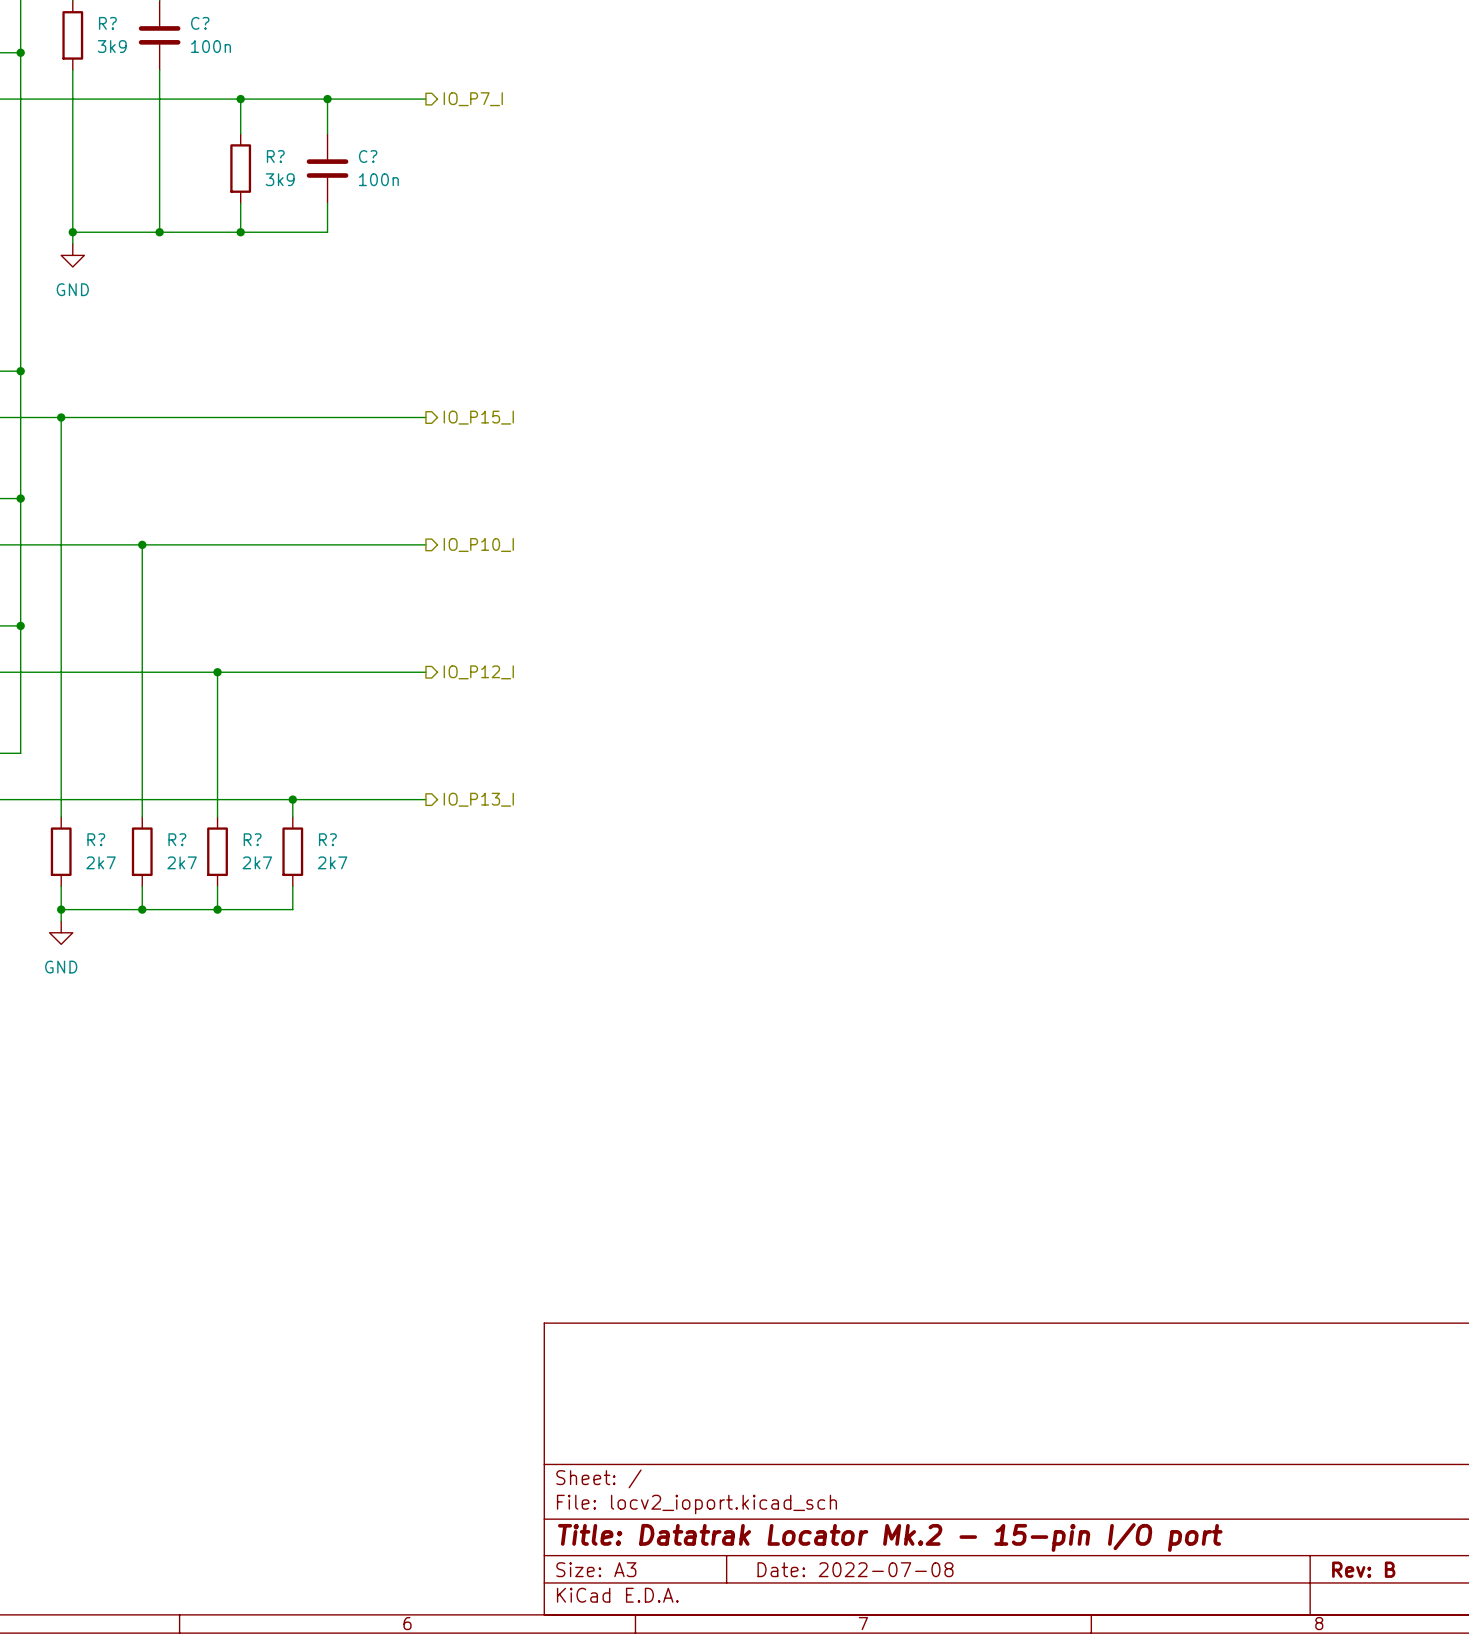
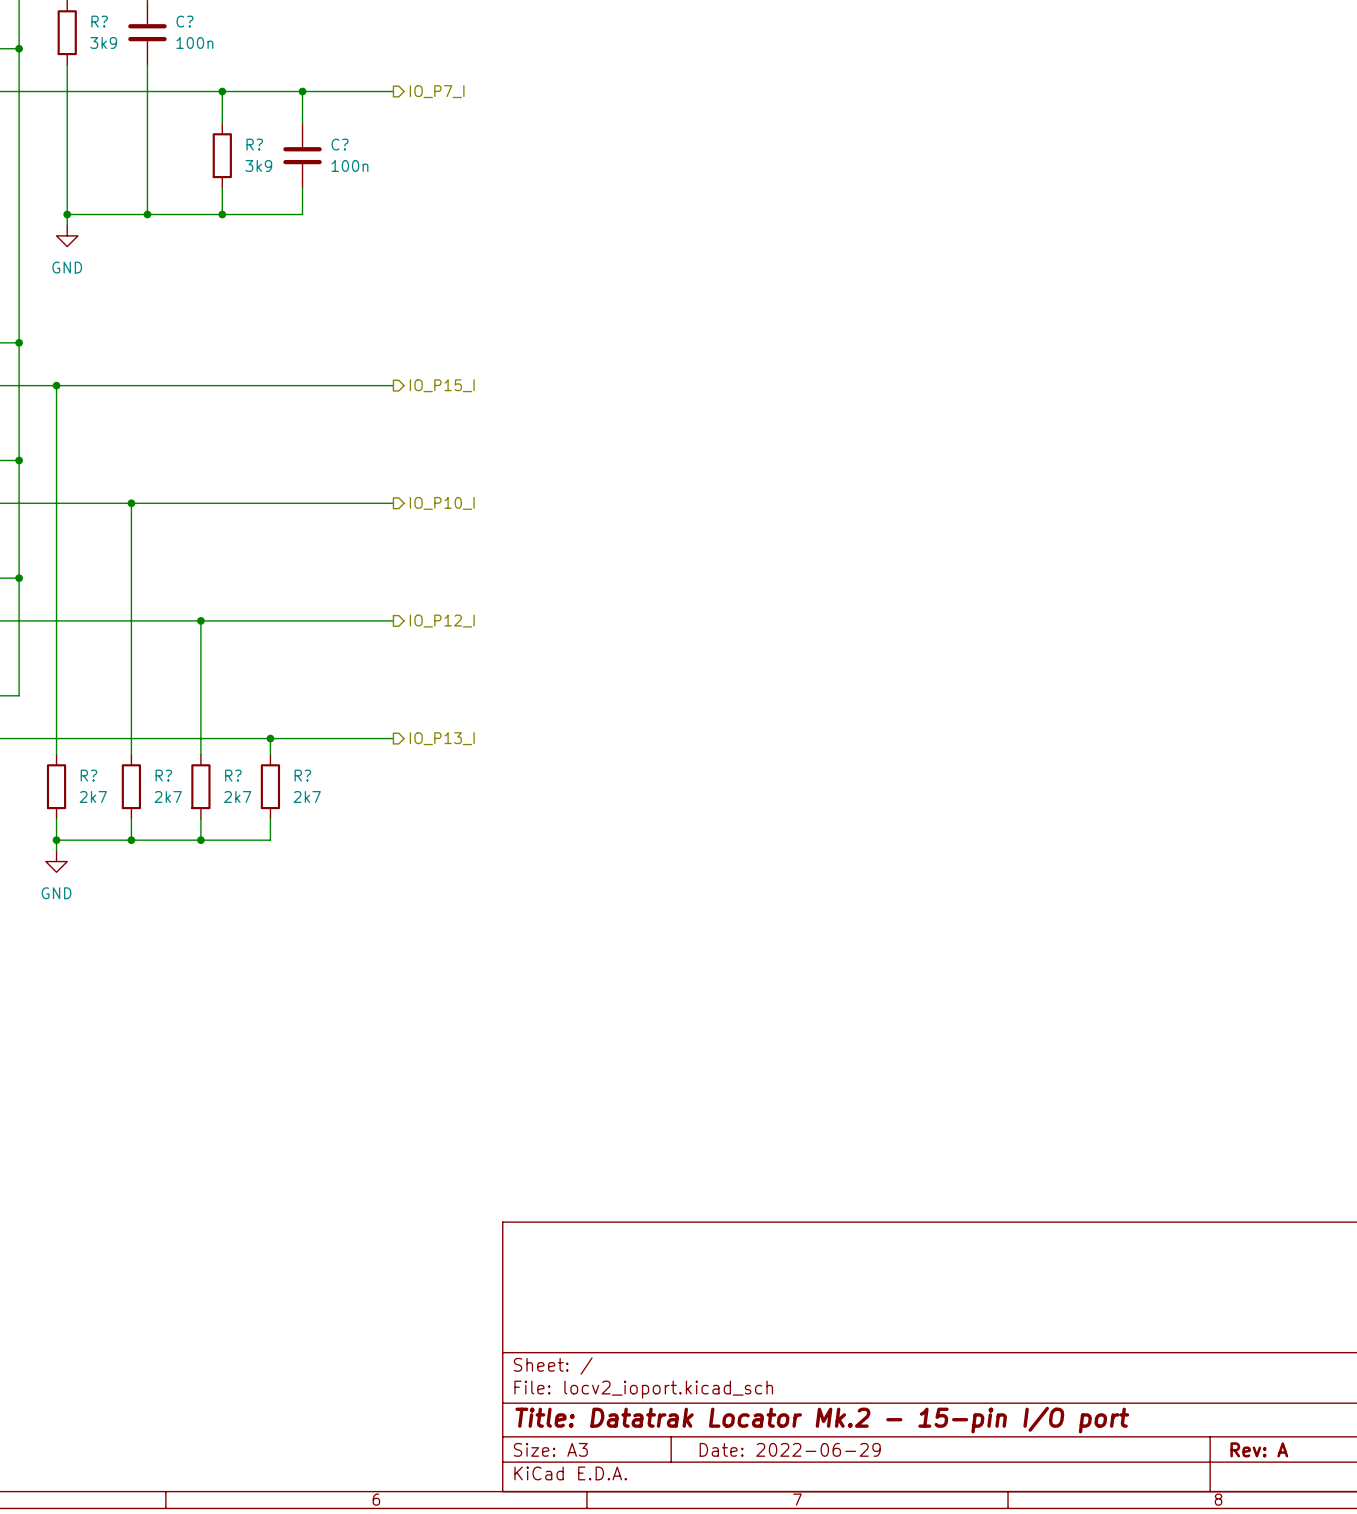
title block: Date: 2022-07-08 (855, 1569) -> Date: 2022-06-29 (790, 1449)
title block: Rev: B (1363, 1569) -> Rev: A (1259, 1449)

